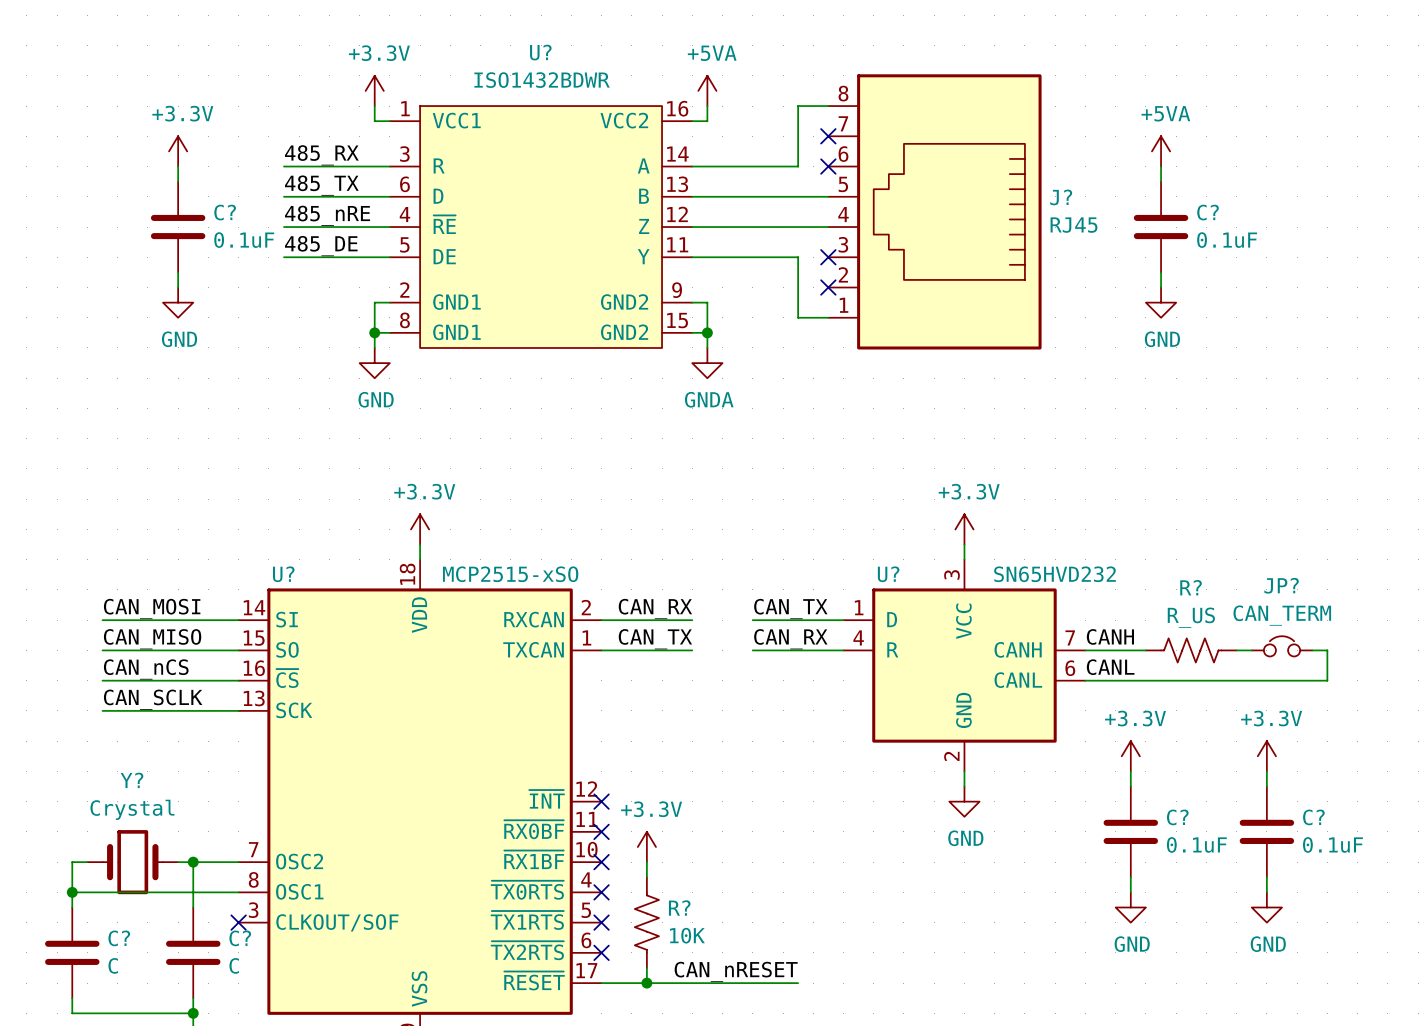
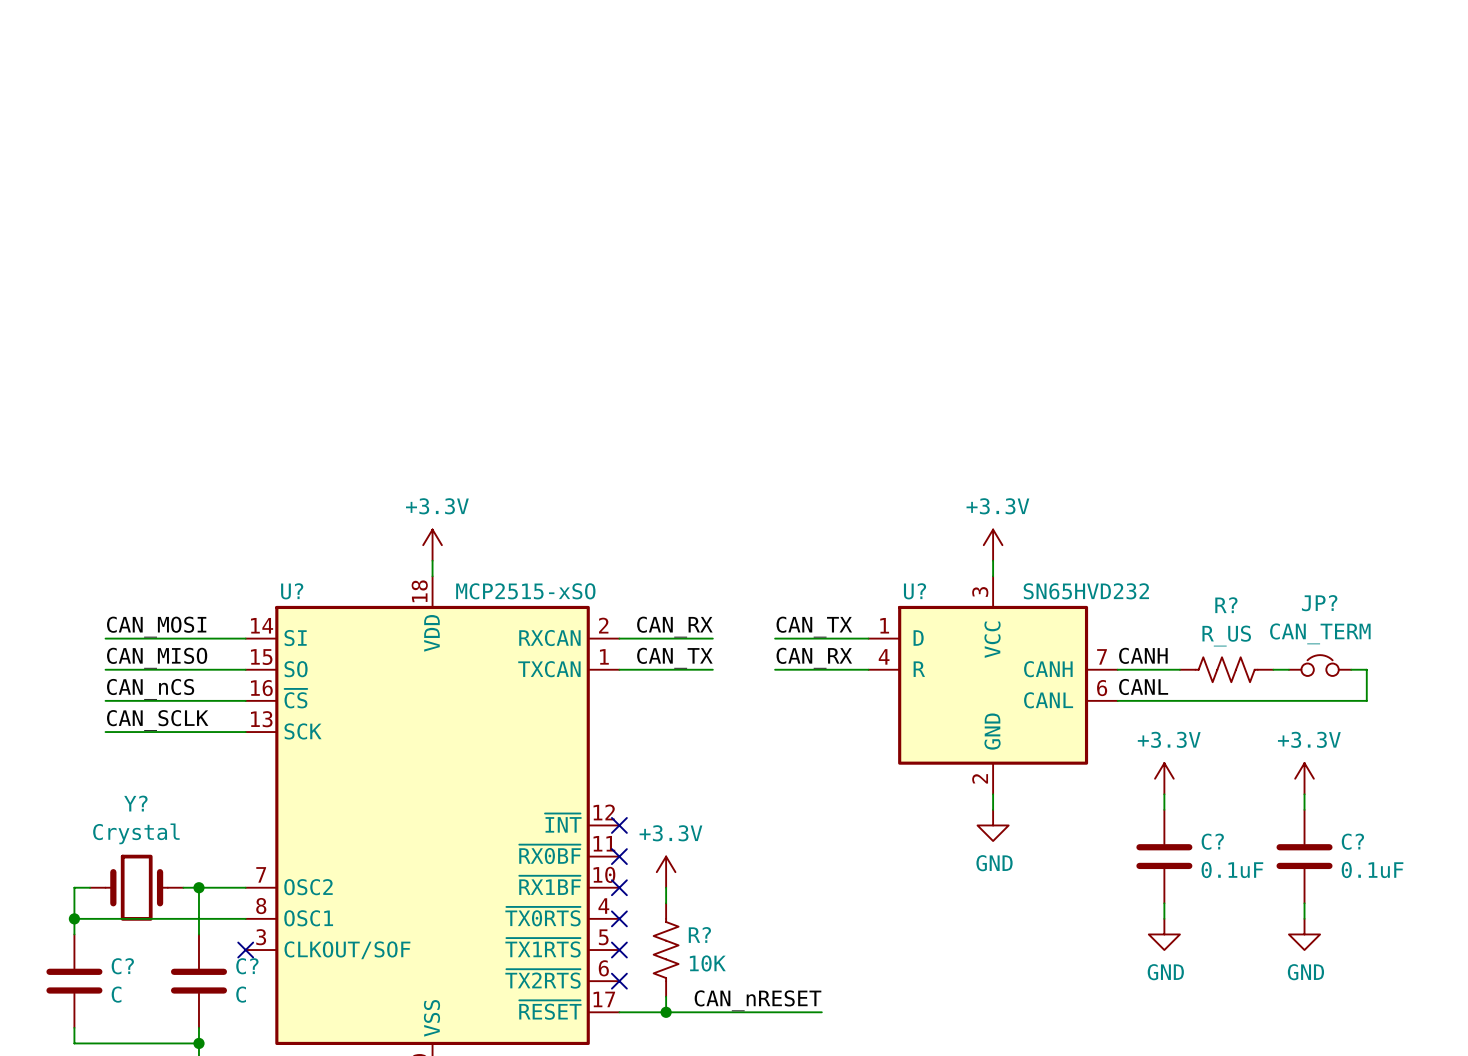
power symbol: +3.3V (374, 90) -> none
power symbol: +5VA (707, 90) -> none
wire: (374, 106) (374, 121) (389, 121) -> none
wire: (707, 106) (707, 121) (692, 121) -> none
wire: (828, 106) (798, 106) (798, 166) (692, 166) -> none
no-connect mark: (828, 136) -> none
power symbol: +3.3V (178, 151) -> none
power symbol: +5VA (1161, 151) -> none
label: 485_RX (321, 155) -> none
wire: (178, 166) (178, 181) -> none
wire: (283, 166) (389, 166) -> none
no-connect mark: (828, 166) -> none
wire: (1161, 166) (1161, 181) -> none
label: 485_TX (321, 185) -> none
wire: (283, 196) (389, 196) -> none
wire: (692, 196) (828, 196) -> none
J?: RJ45 (934, 211) -> none
label: 485_nRE (327, 215) -> none
C?: 0.1uF (178, 227) -> none
wire: (283, 227) (389, 227) -> none
U?: ISO1432BDWR (541, 227) -> none
wire: (692, 227) (828, 227) -> none
C?: 0.1uF (1161, 227) -> none
label: 485_DE (321, 246) -> none
wire: (283, 257) (389, 257) -> none
wire: (692, 257) (798, 257) (798, 317) (828, 317) -> none
no-connect mark: (828, 257) -> none
wire: (178, 272) (178, 287) -> none
wire: (1161, 272) (1161, 287) -> none
no-connect mark: (828, 287) -> none
power symbol: GND (178, 302) -> none
wire: (389, 302) (374, 302) (374, 347) -> none
wire: (692, 302) (707, 302) (707, 347) -> none
power symbol: GND (1161, 302) -> none
wire: (374, 332) (389, 332) -> none
junction: (374, 332) -> none
wire: (692, 332) (707, 332) -> none
junction: (707, 332) -> none
power symbol: GND (374, 363) -> none
power symbol: GNDA (707, 363) -> none

